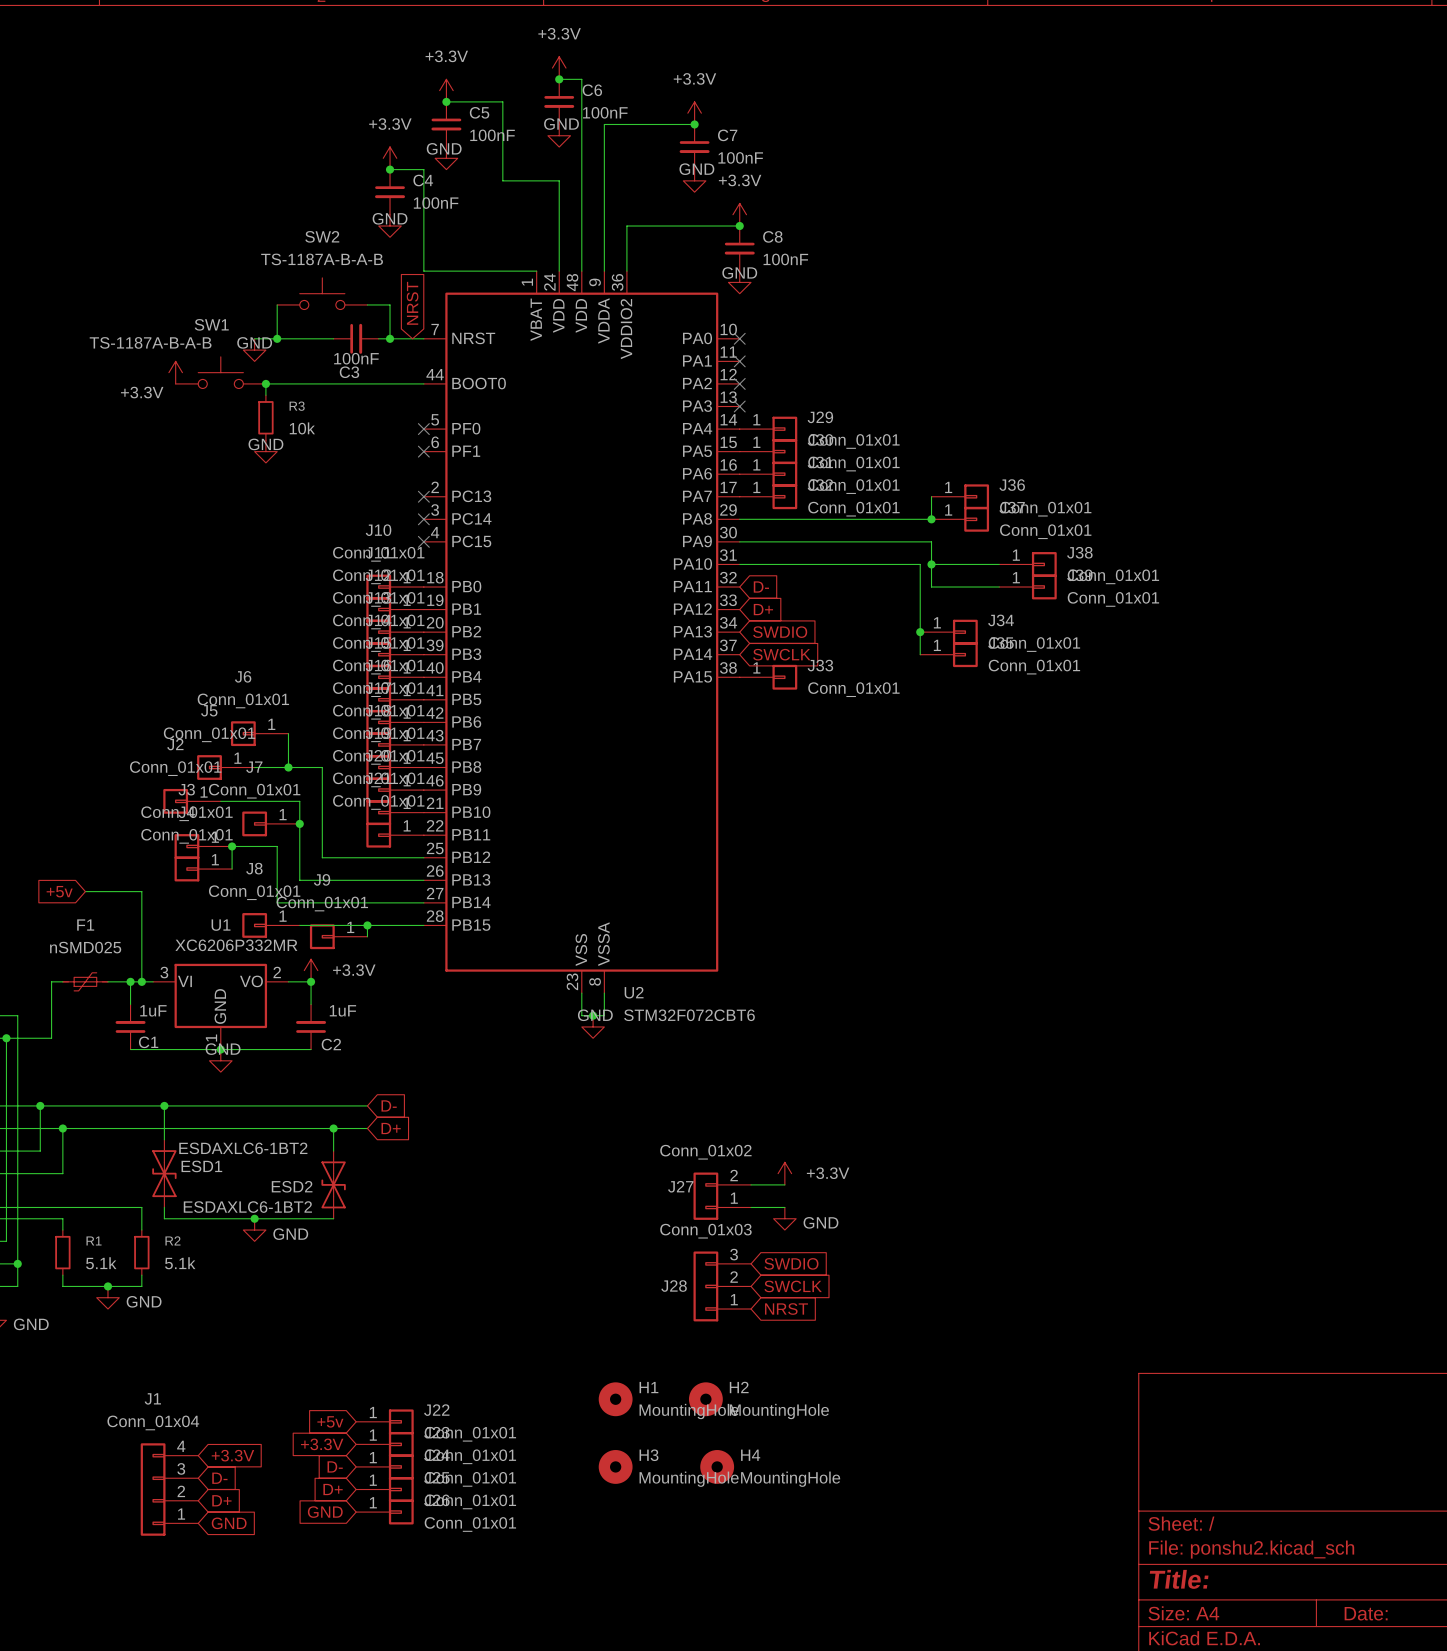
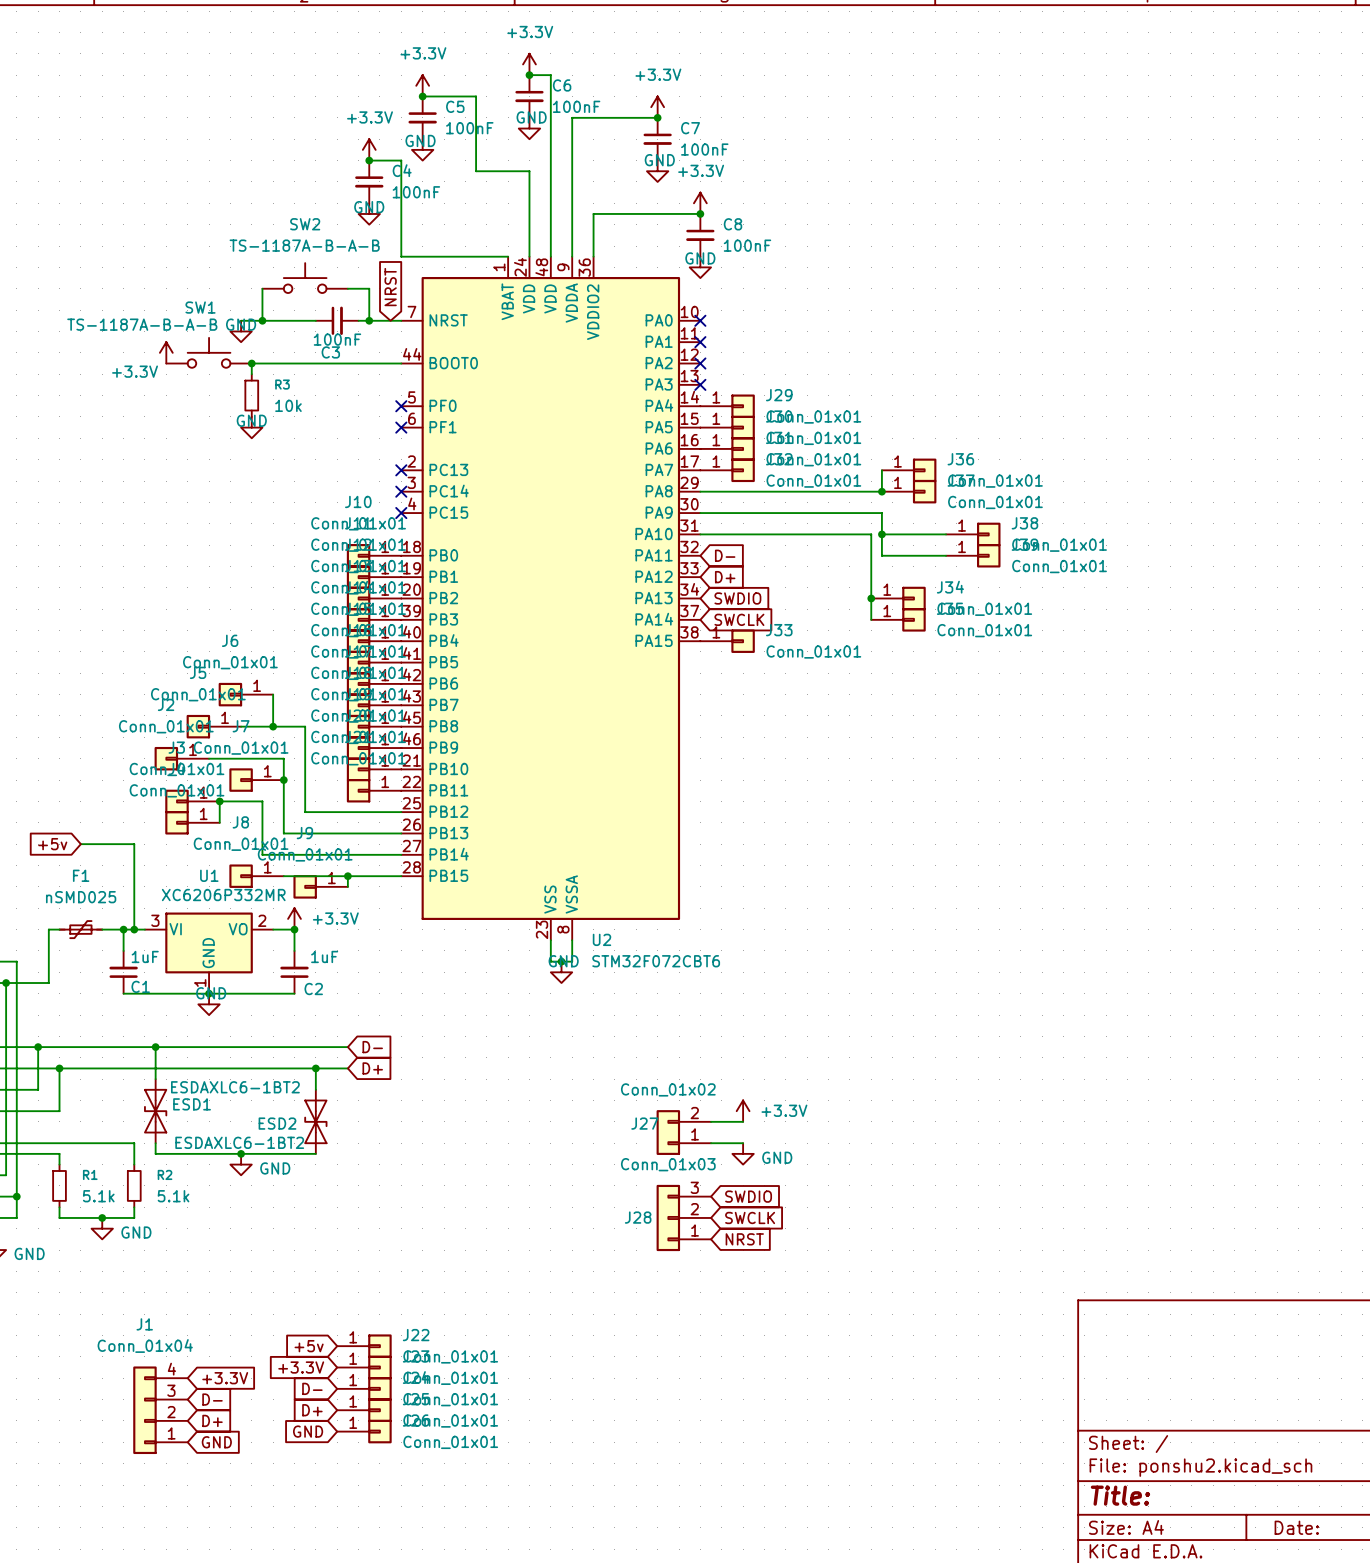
H1: MountingHole (615, 1399) -> none
H2: MountingHole (705, 1399) -> none
H3: MountingHole (615, 1466) -> none
H4: MountingHole (717, 1466) -> none

